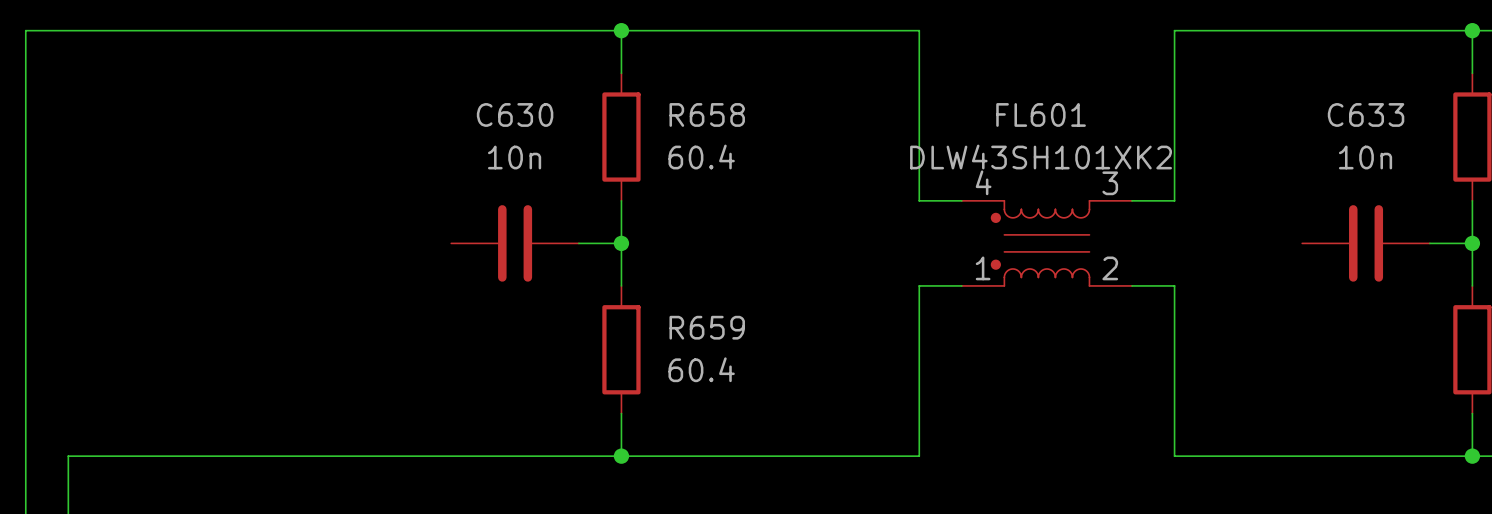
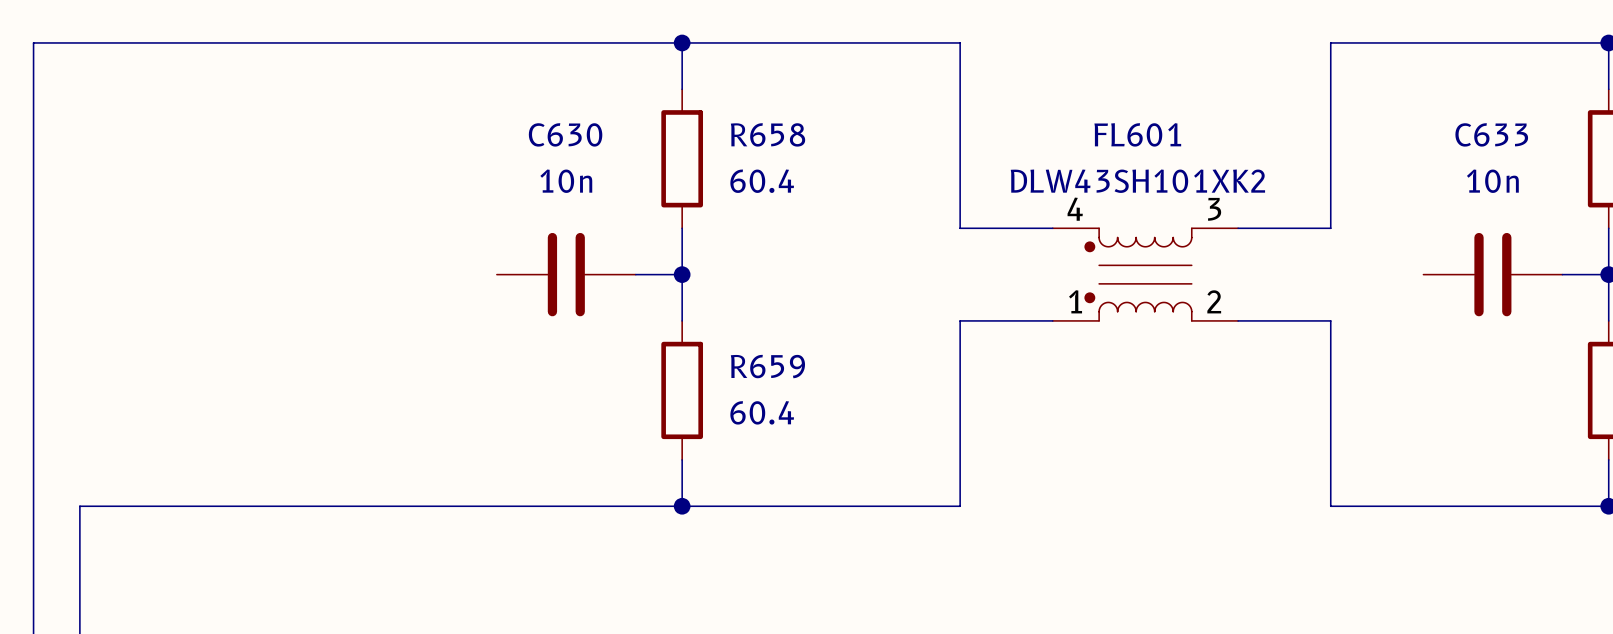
wire: (876, 30) (919, 30) (919, 200) -> (960, 42) (960, 228) (1006, 228)
wire: (1217, 30) (1174, 30) (1174, 200) -> (1330, 42) (1330, 228) (1284, 228)
wire: (919, 285) (919, 456) (876, 456) -> (1006, 320) (960, 320) (960, 506)
wire: (1174, 285) (1174, 456) (1217, 456) -> (1284, 320) (1330, 320) (1330, 506)

